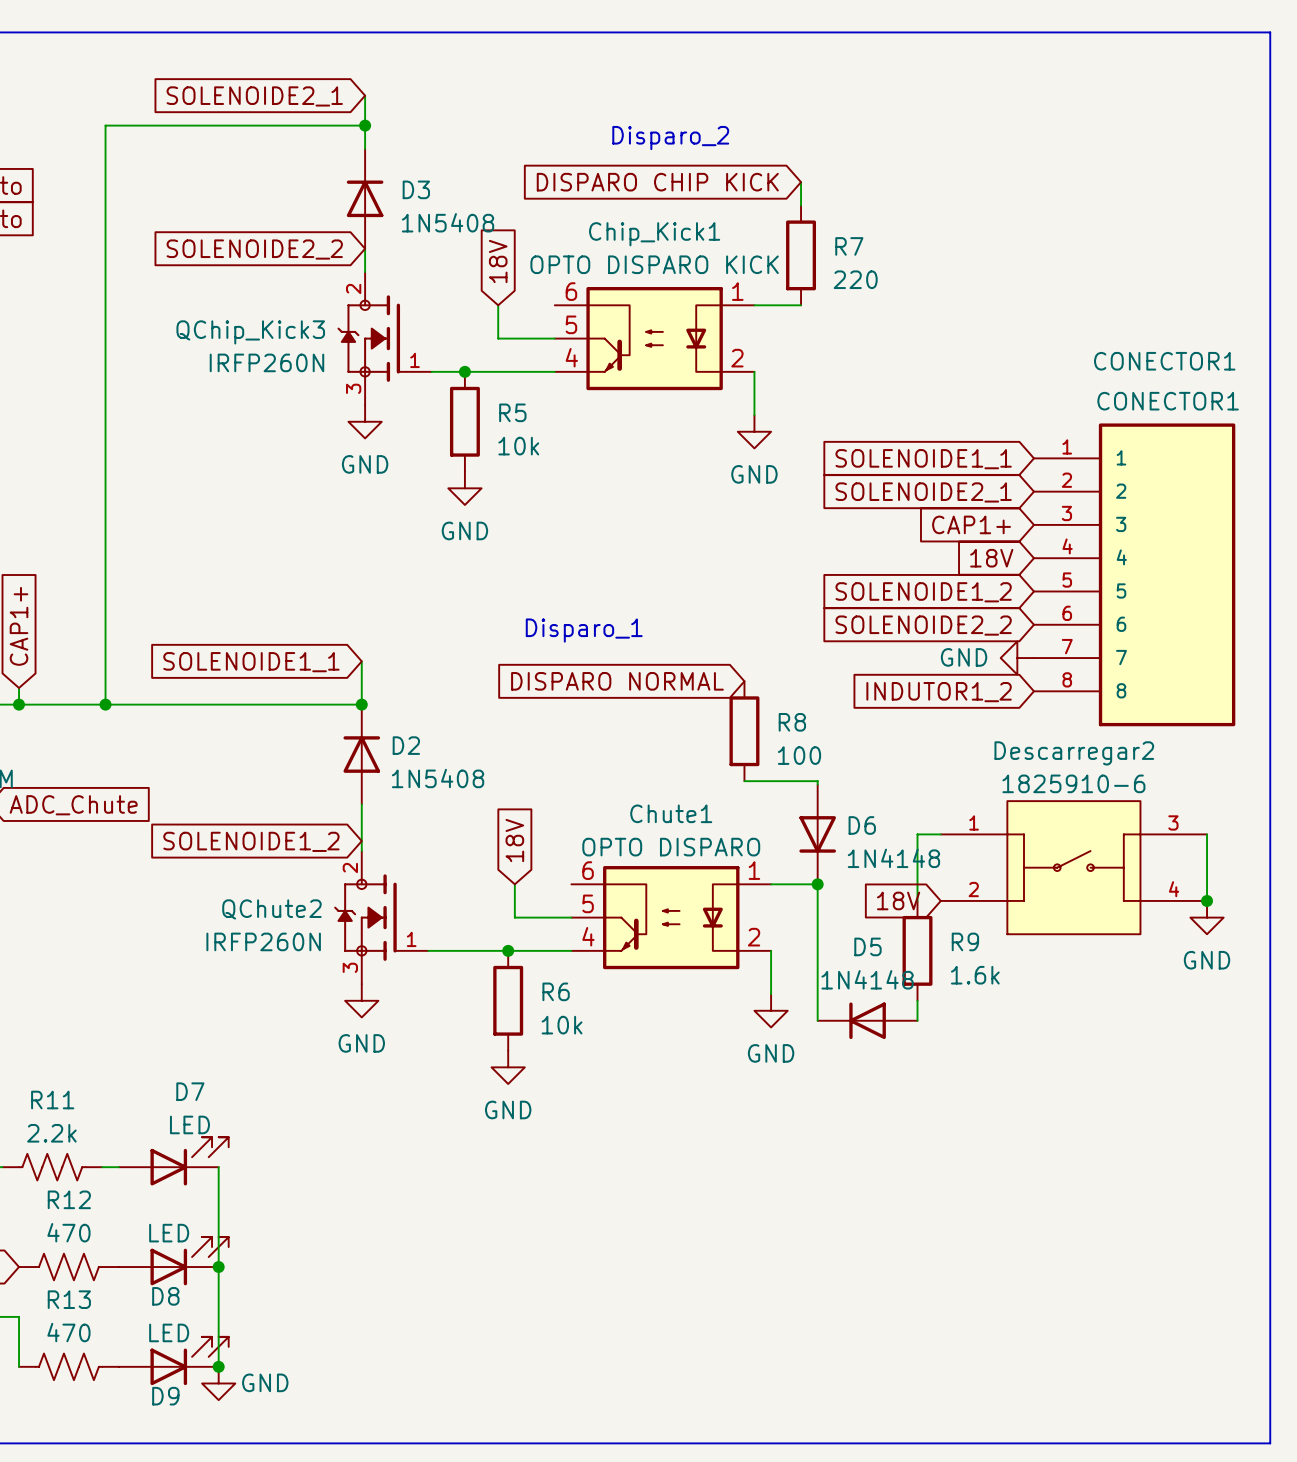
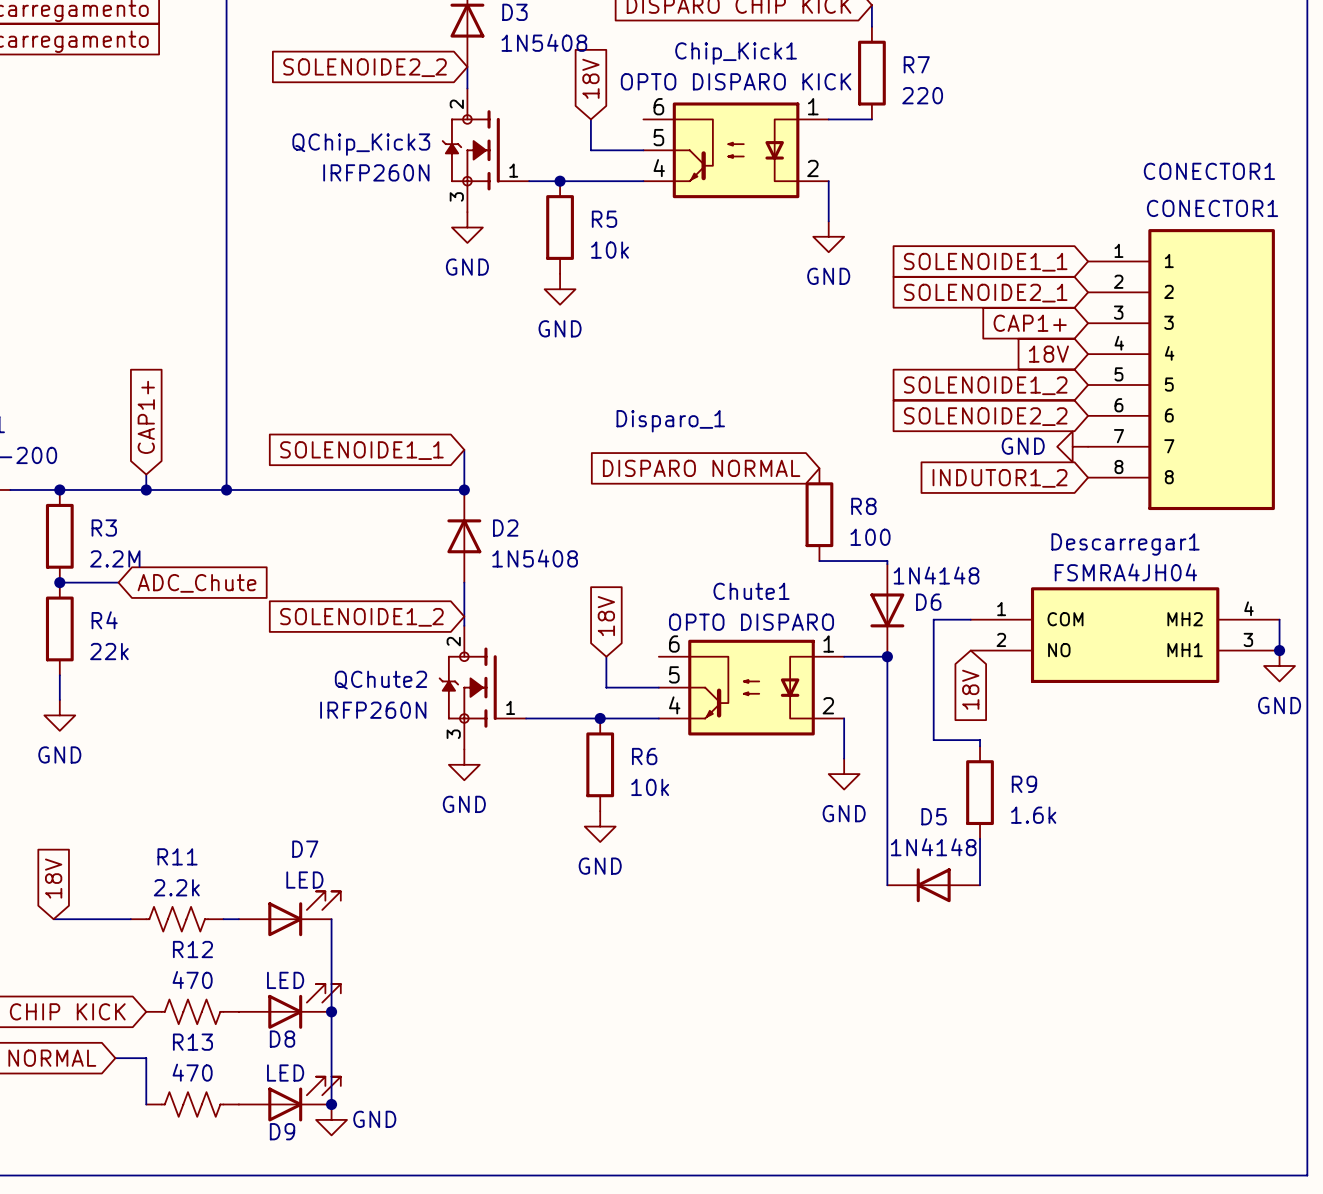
wire: (940, 834) (917, 834) (917, 900) -> none
wire: (1207, 834) (1207, 900) -> none
wire: none -> (970, 619) (933, 619) (933, 740) (980, 740) (980, 746)
wire: none -> (1279, 619) (1279, 650)
D6 value position: 1N4148 (893, 858) -> 1N4148 (936, 575)
Descarregar1: none -> FSMRA4JH04 (1125, 635)
Descarregar2: 1825910-6 (1073, 867) -> none
global label rotation: 0° (898, 900) -> 90° counterclockwise (970, 689)
junction position: (1207, 900) -> (1279, 650)
power symbol position: GND (1207, 917) -> GND (1279, 666)
R9 position: (917, 950) -> (980, 792)
wire: (917, 1000) (917, 1020) -> none
wire: none -> (887, 783) (887, 885)
D5 position: (867, 1020) -> (933, 885)
wire: none -> (980, 838) (980, 885)

